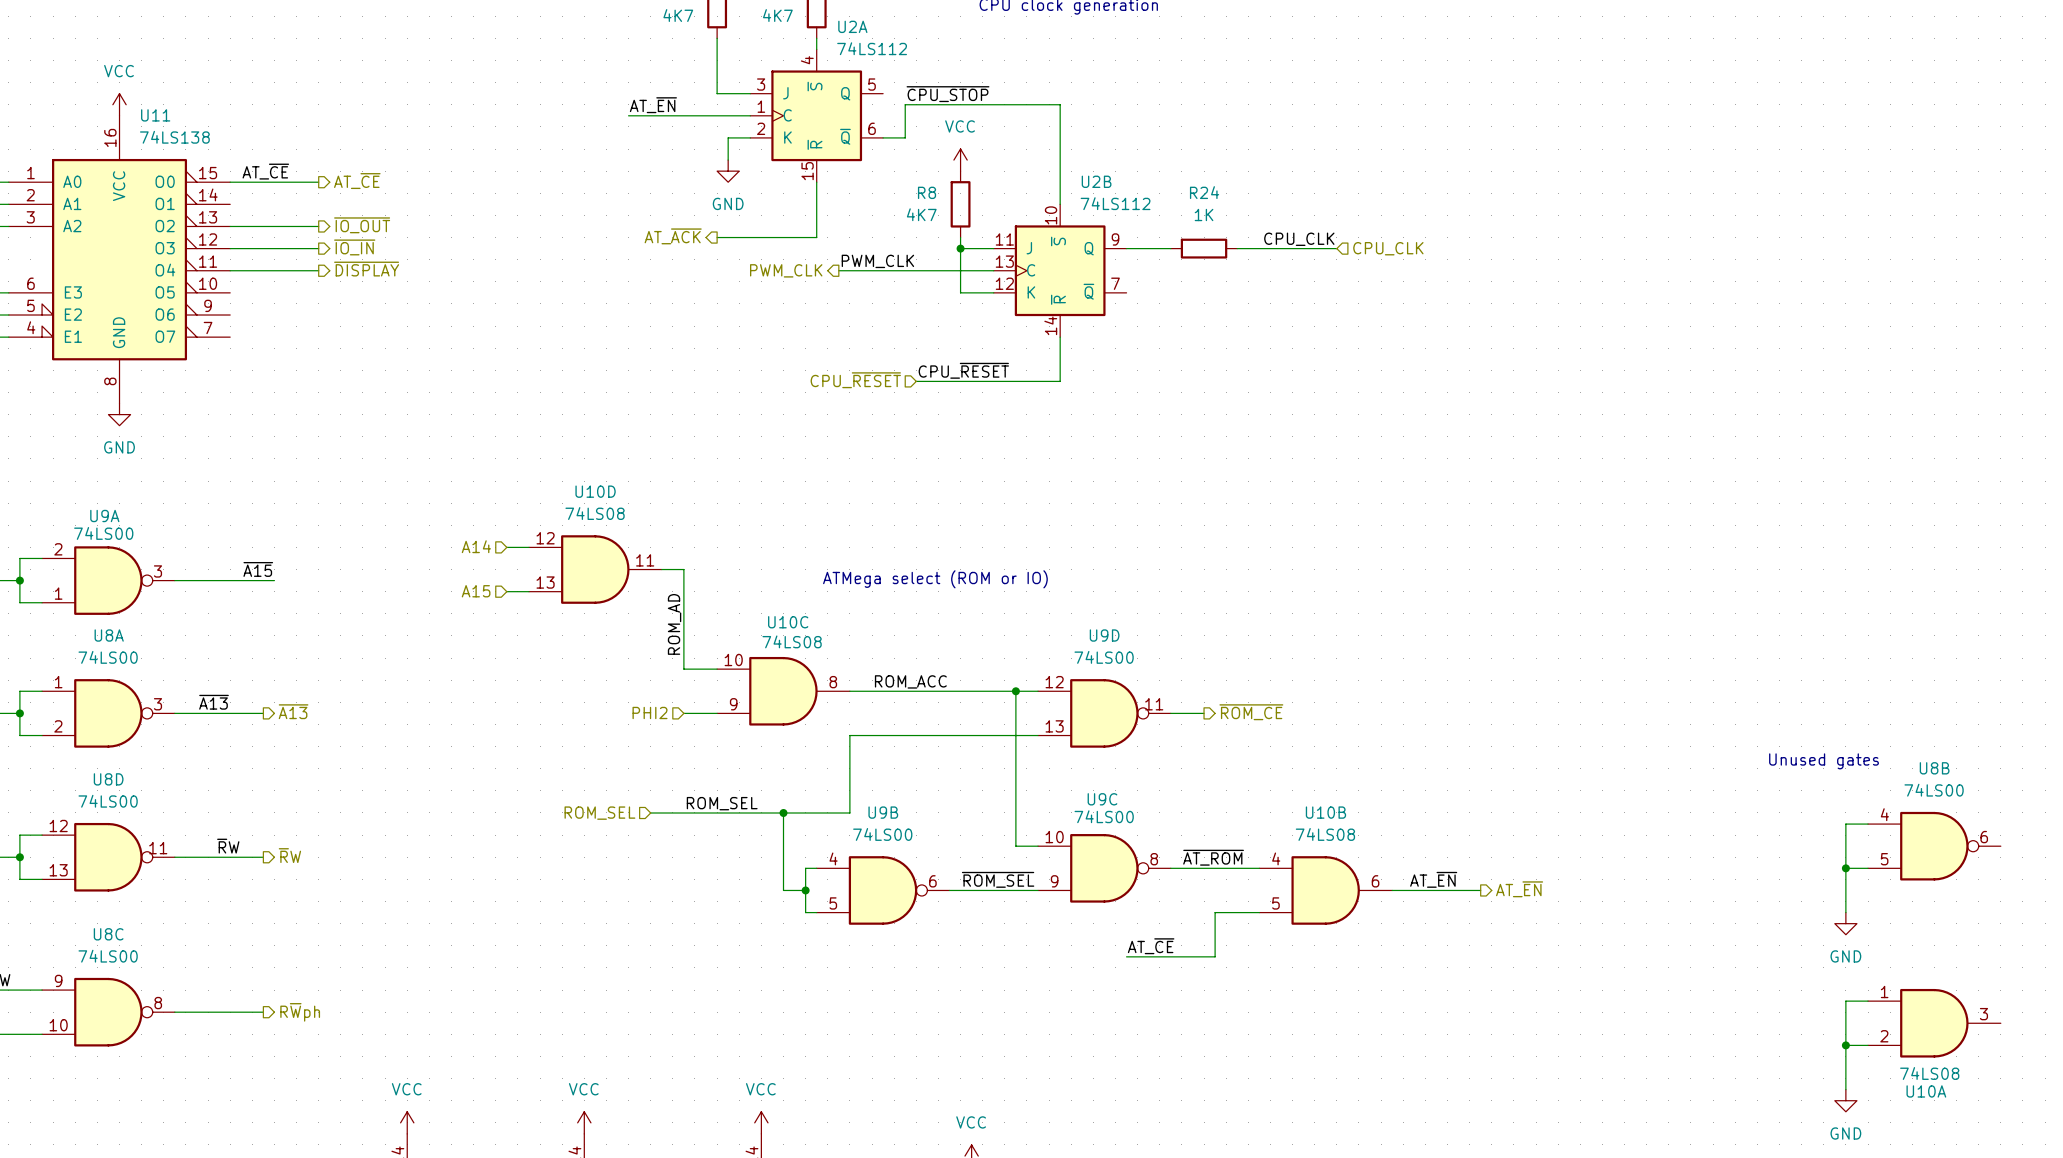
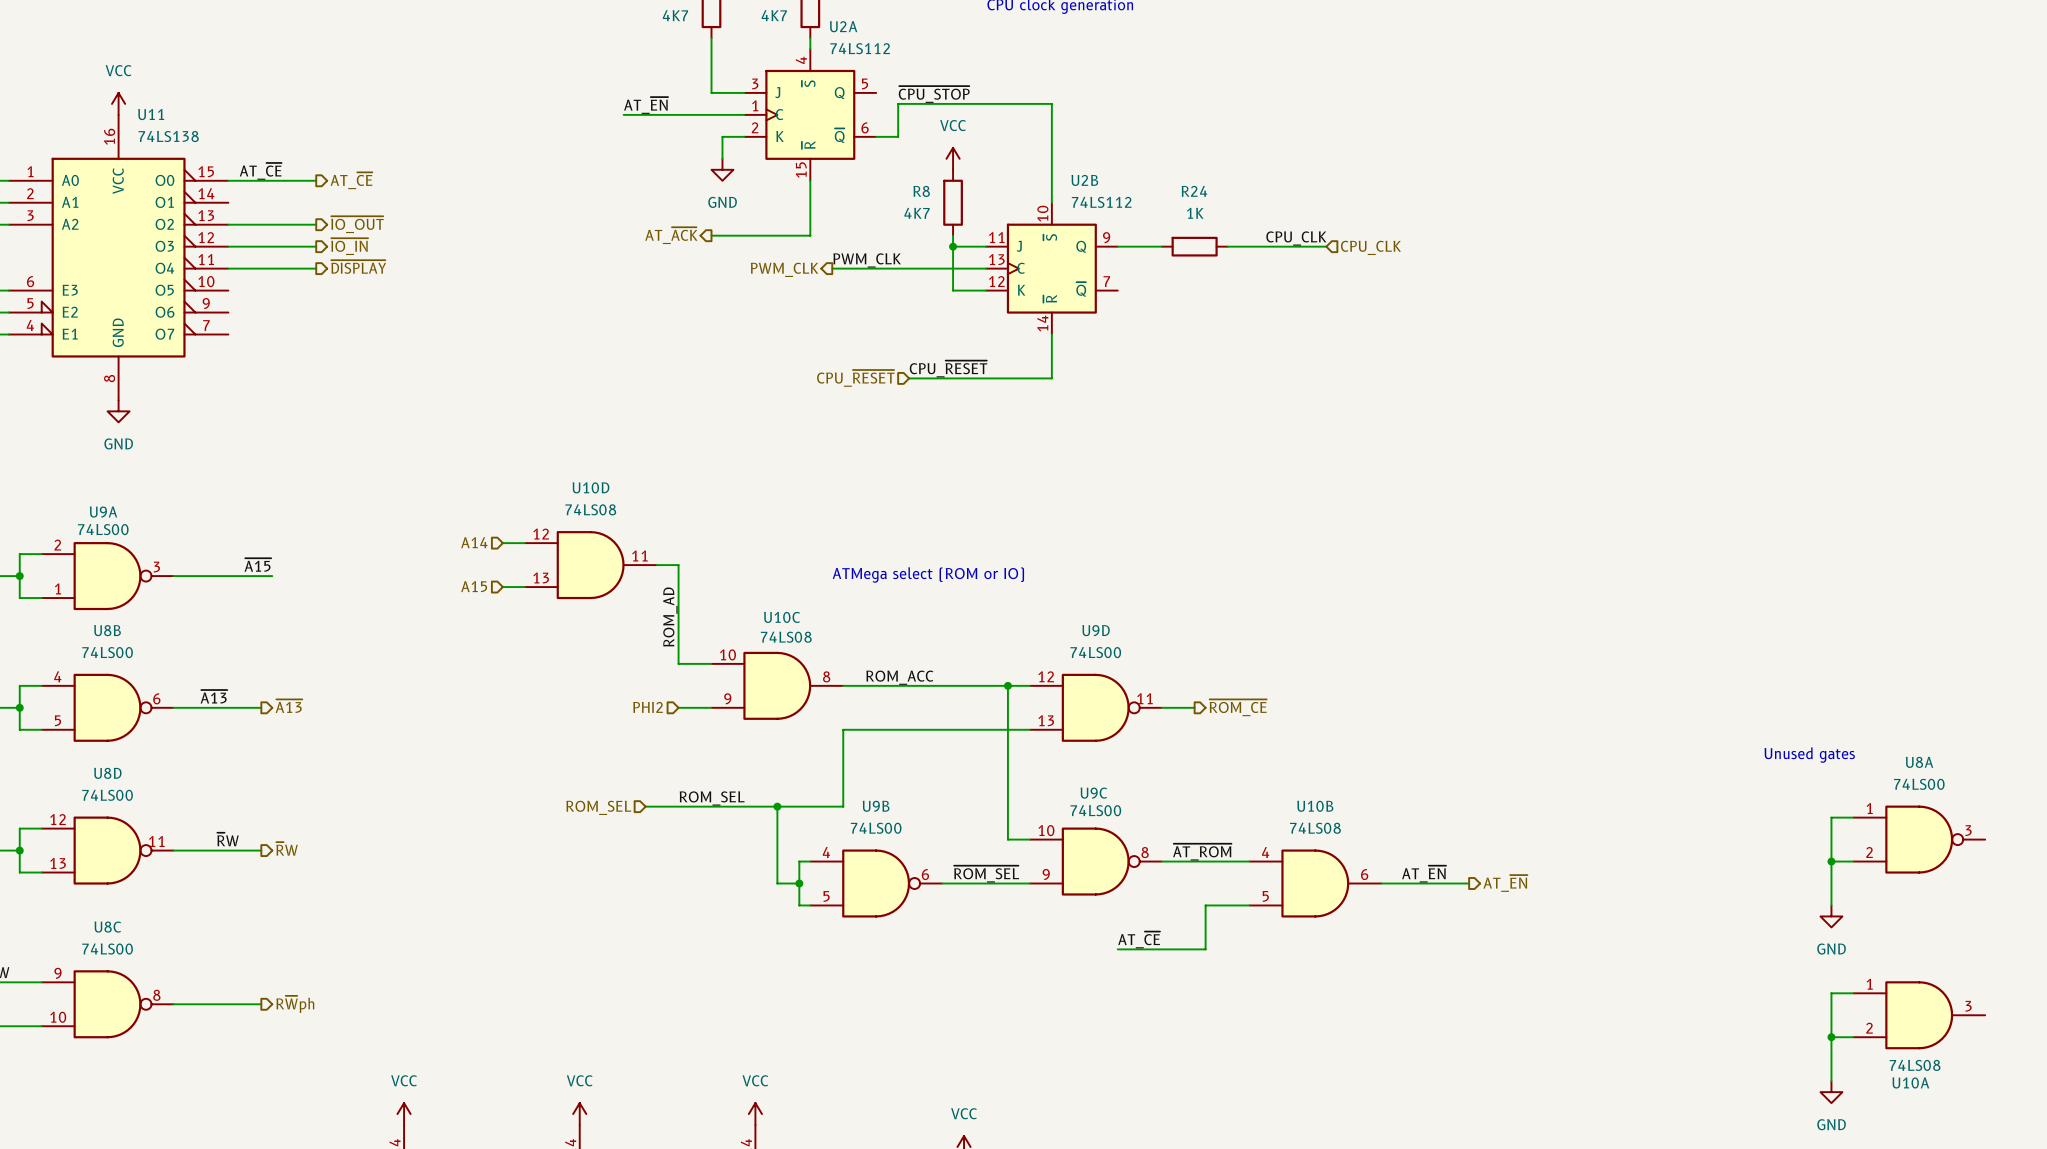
U8A position: (108, 713) -> (1919, 839)
U8B position: (1934, 846) -> (107, 707)

